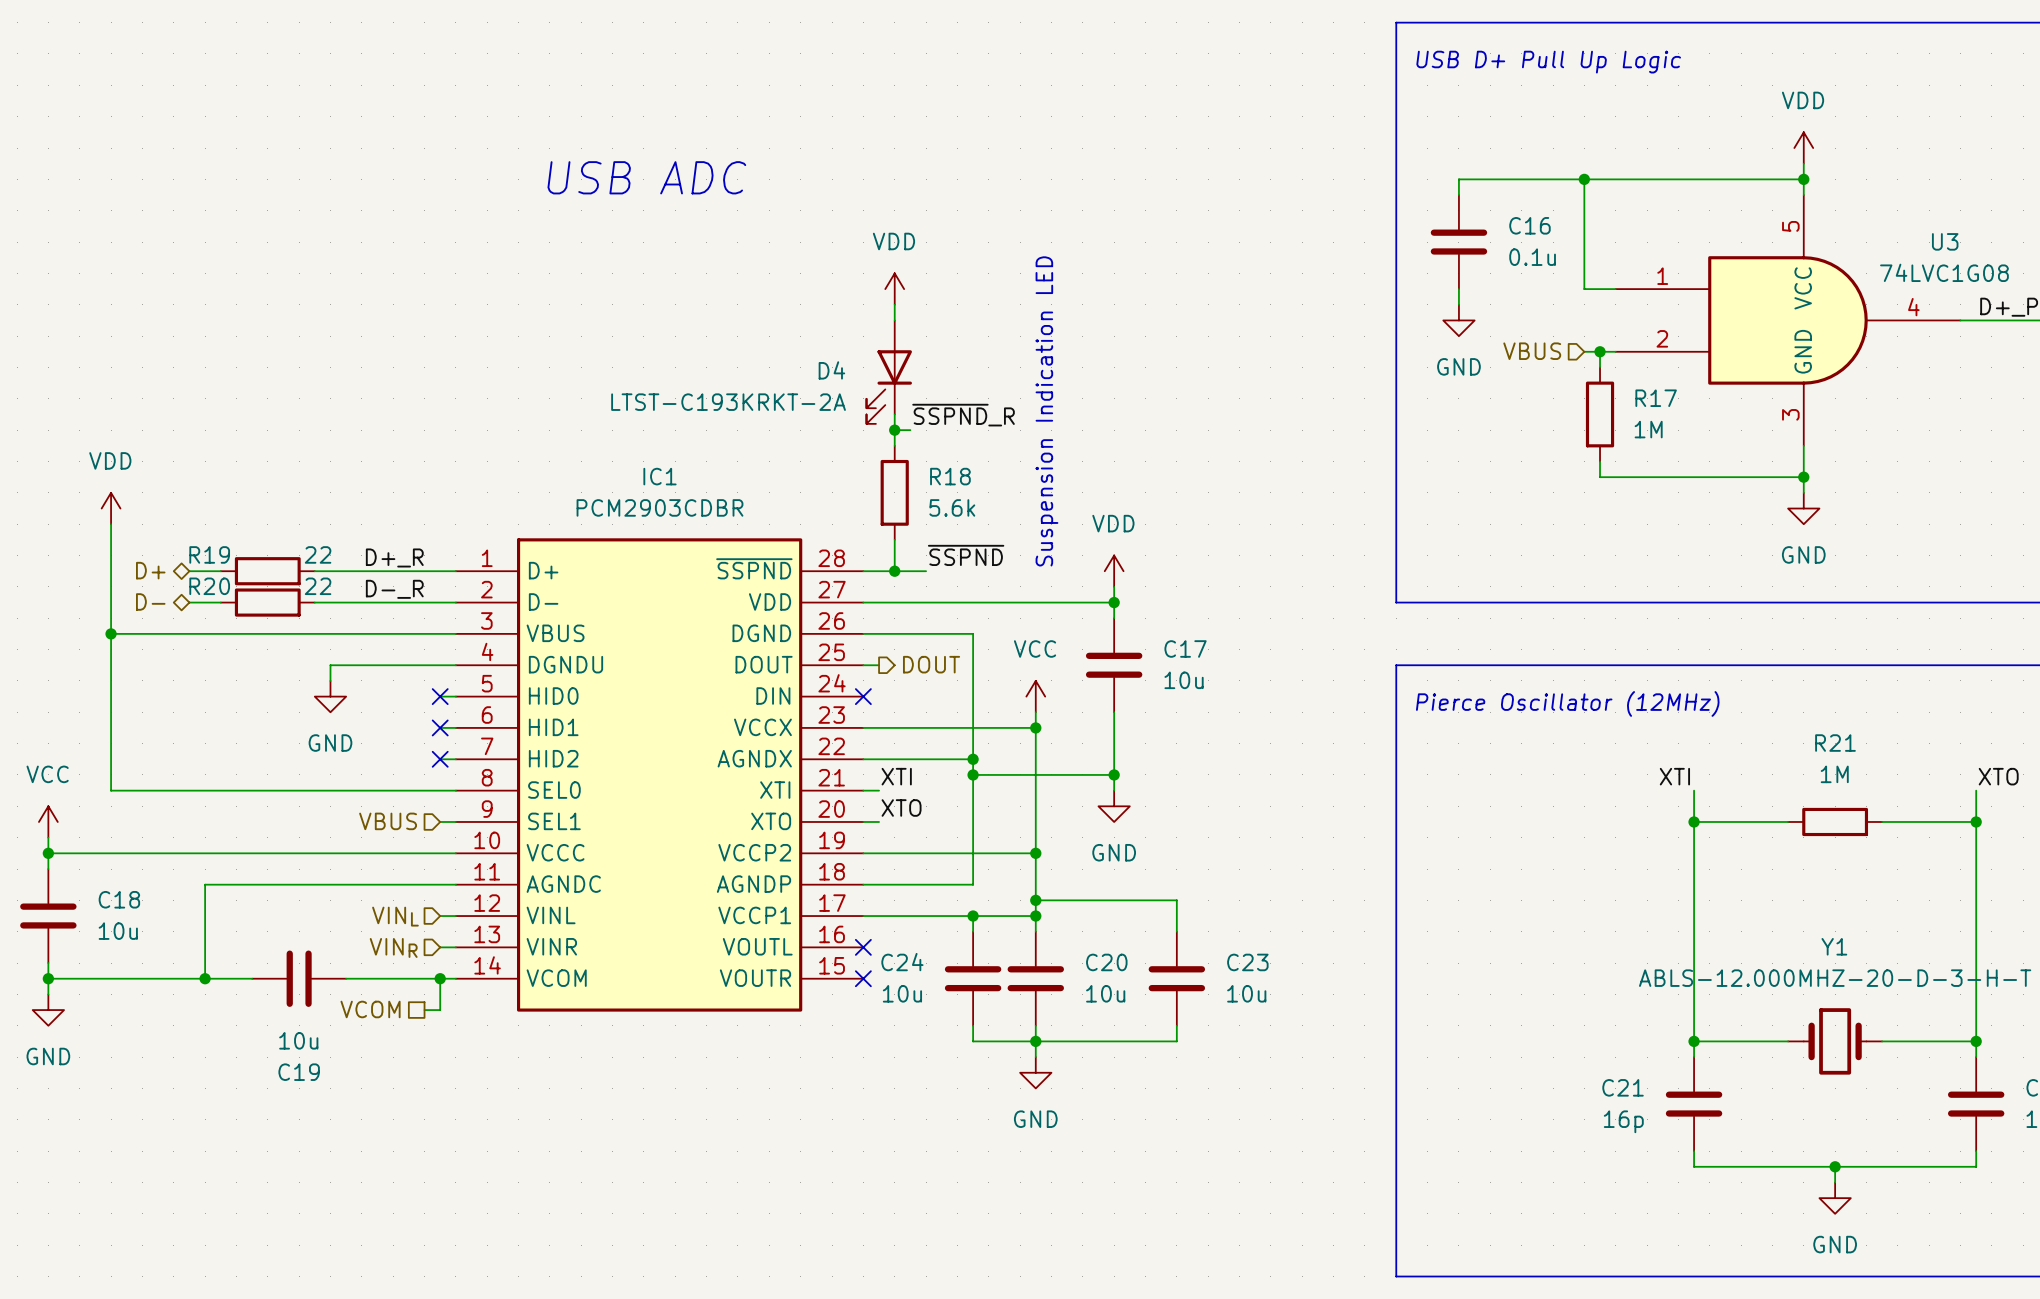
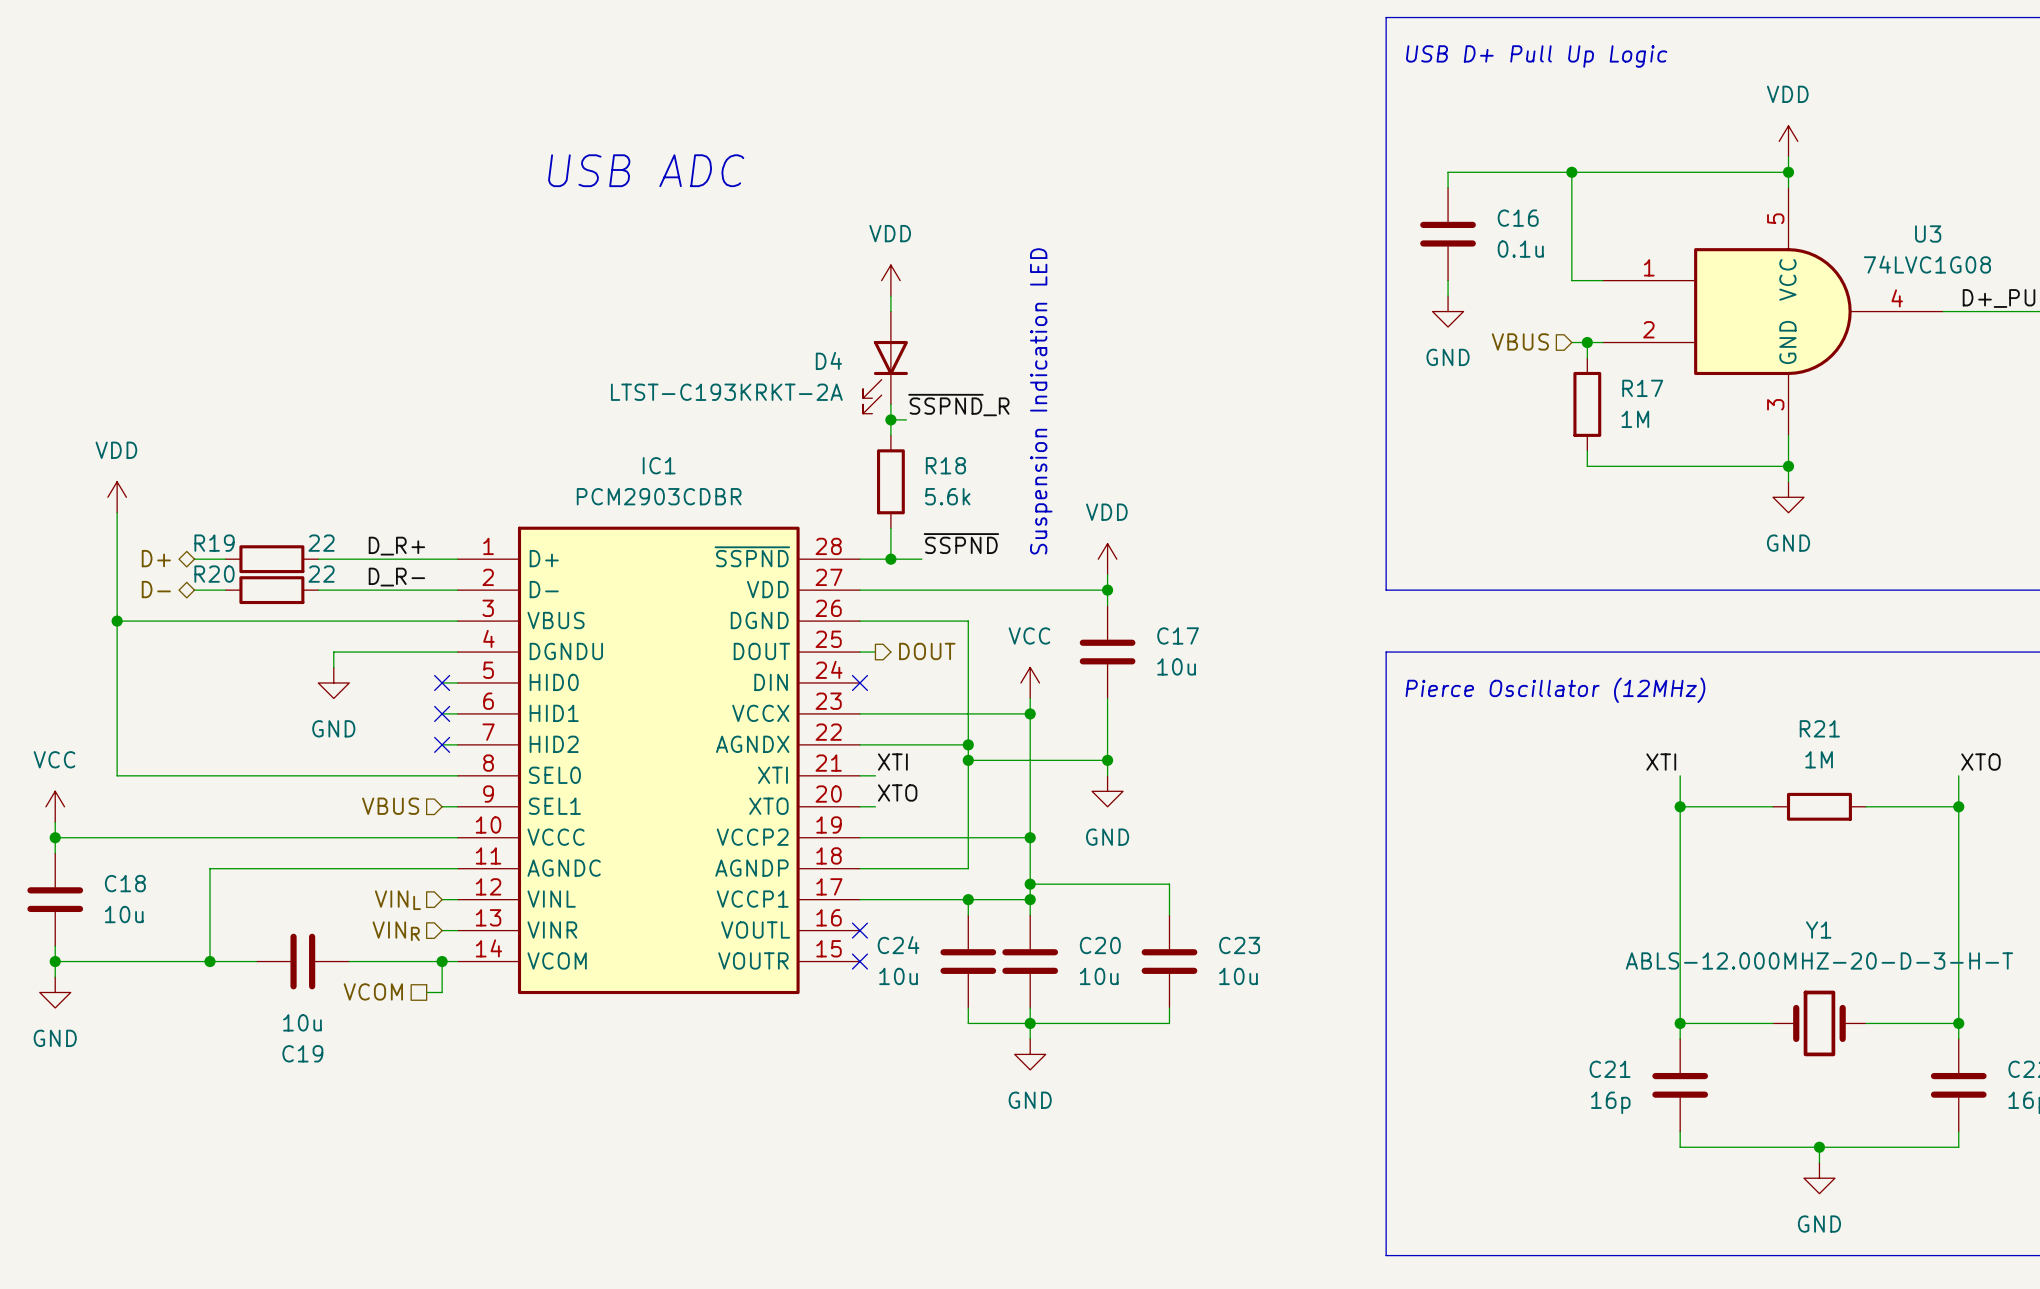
label: D+_R (394, 557) -> D_R+ (396, 546)
label: D-_R (394, 589) -> D_R- (396, 577)

